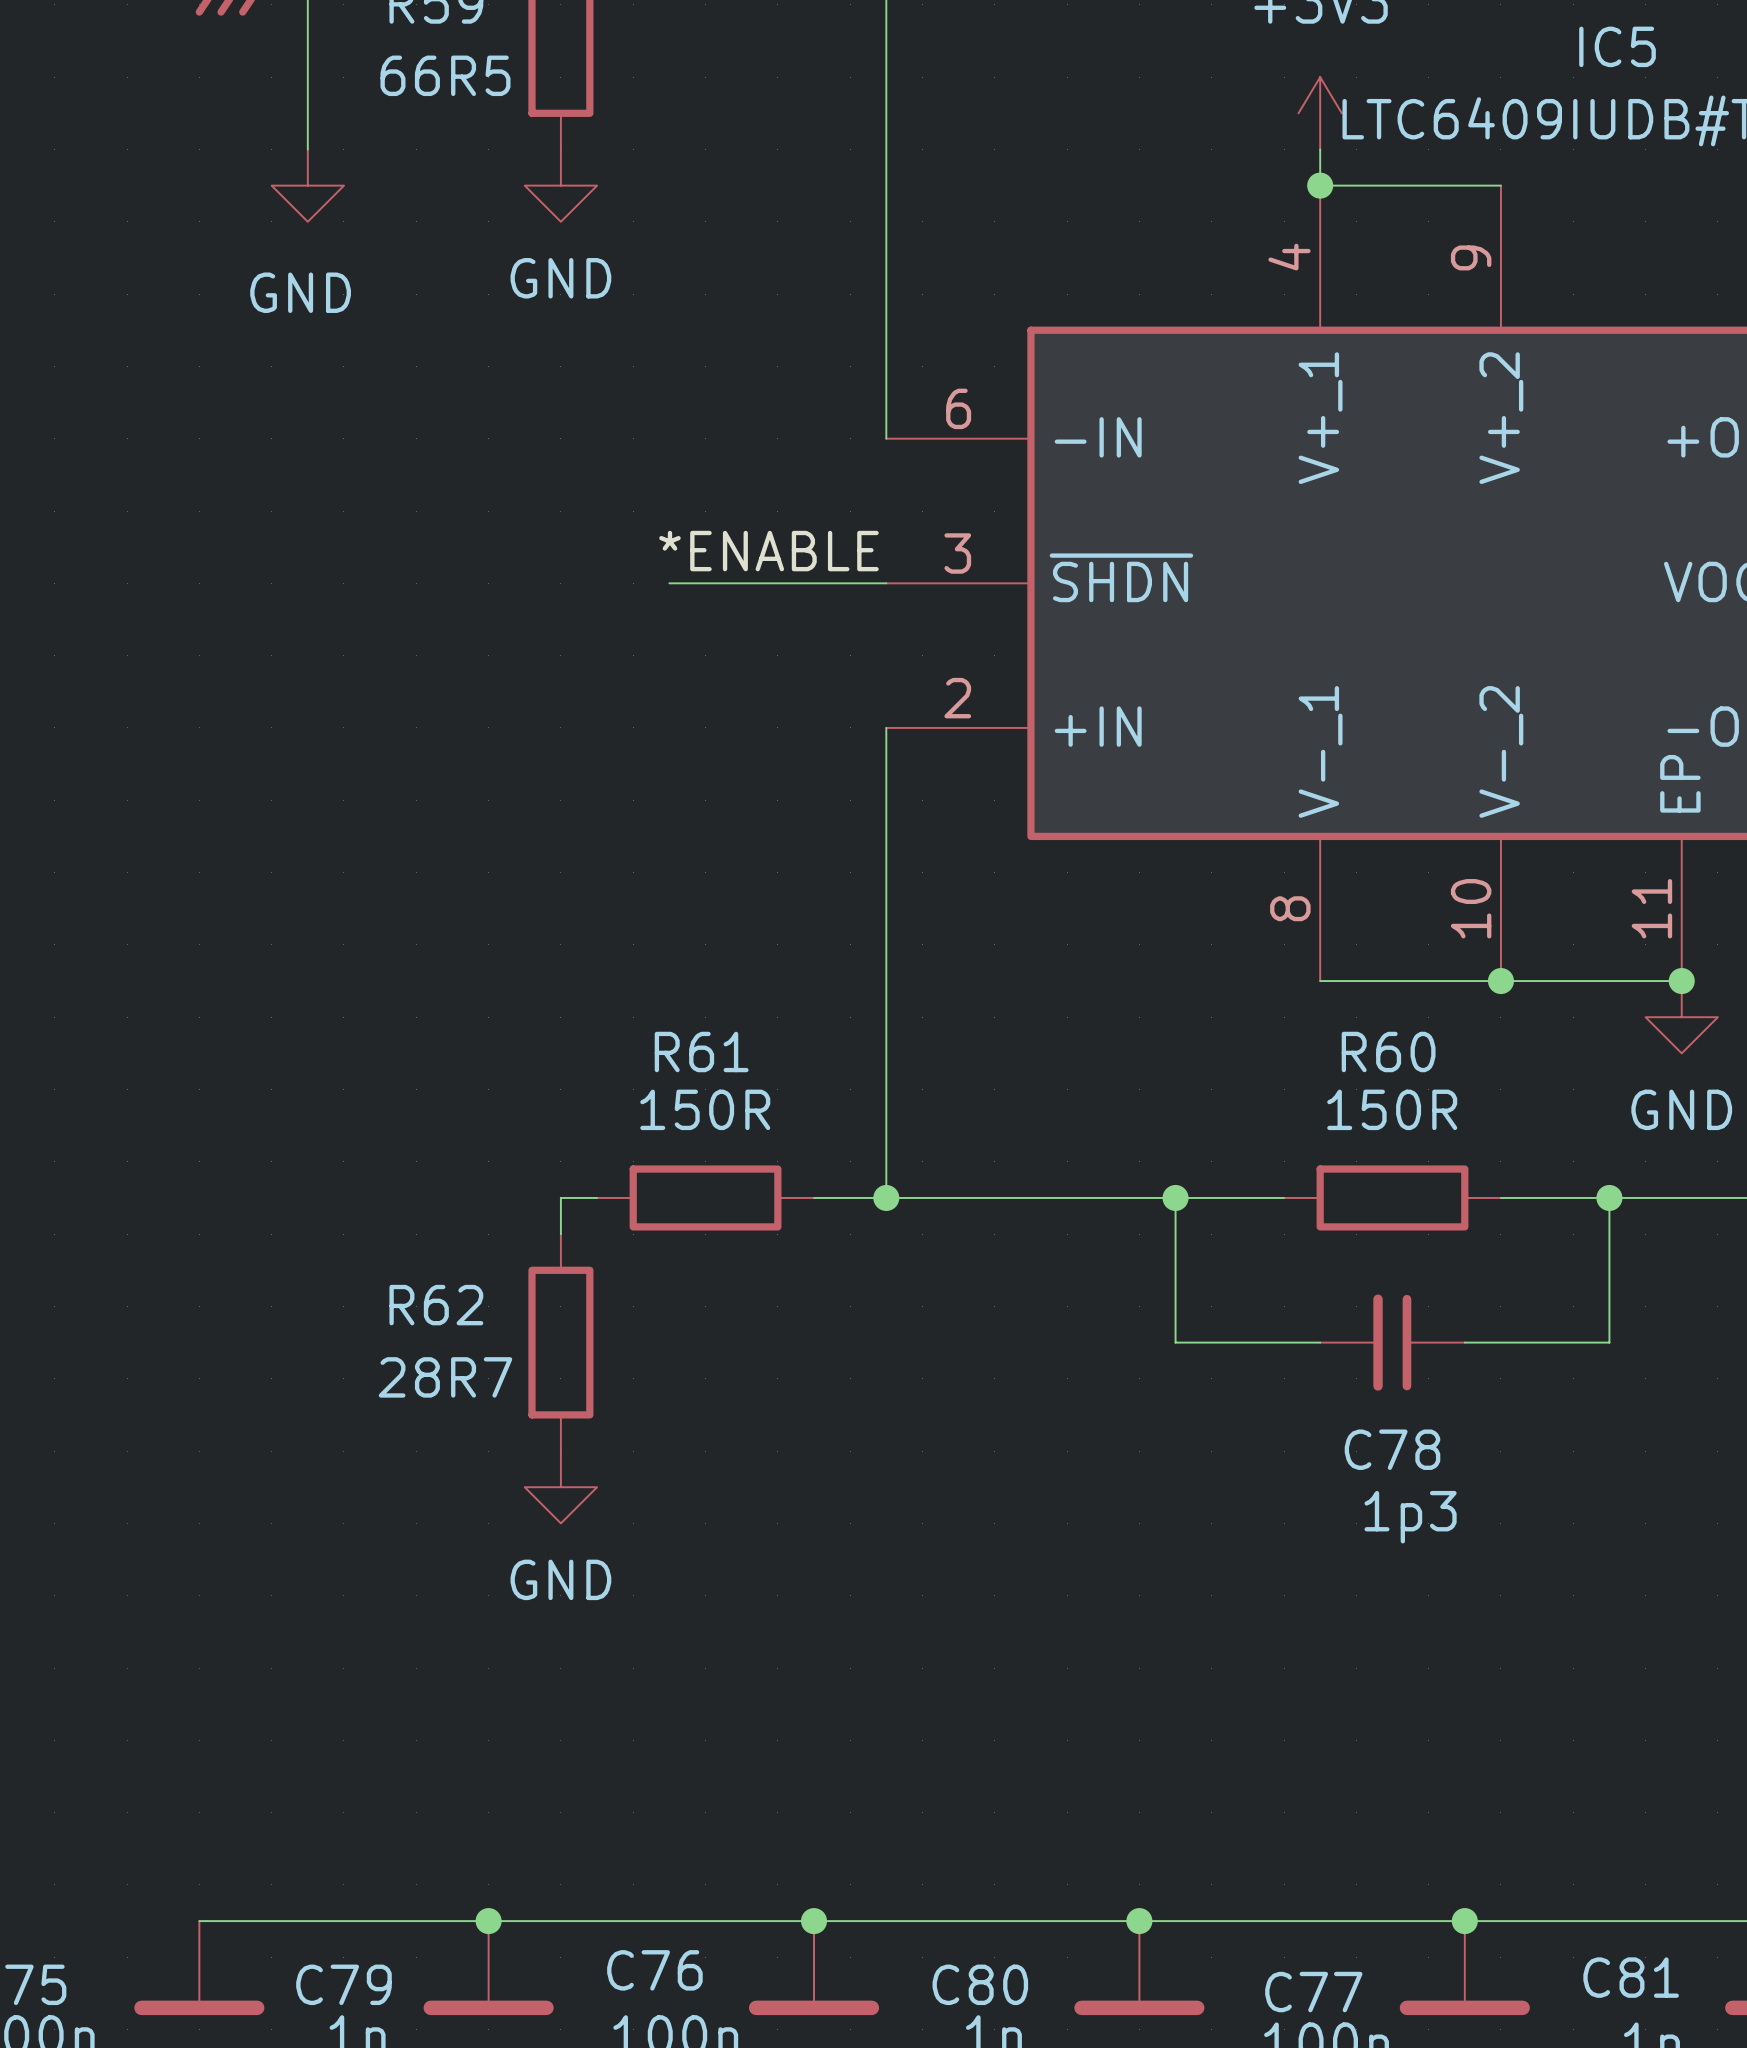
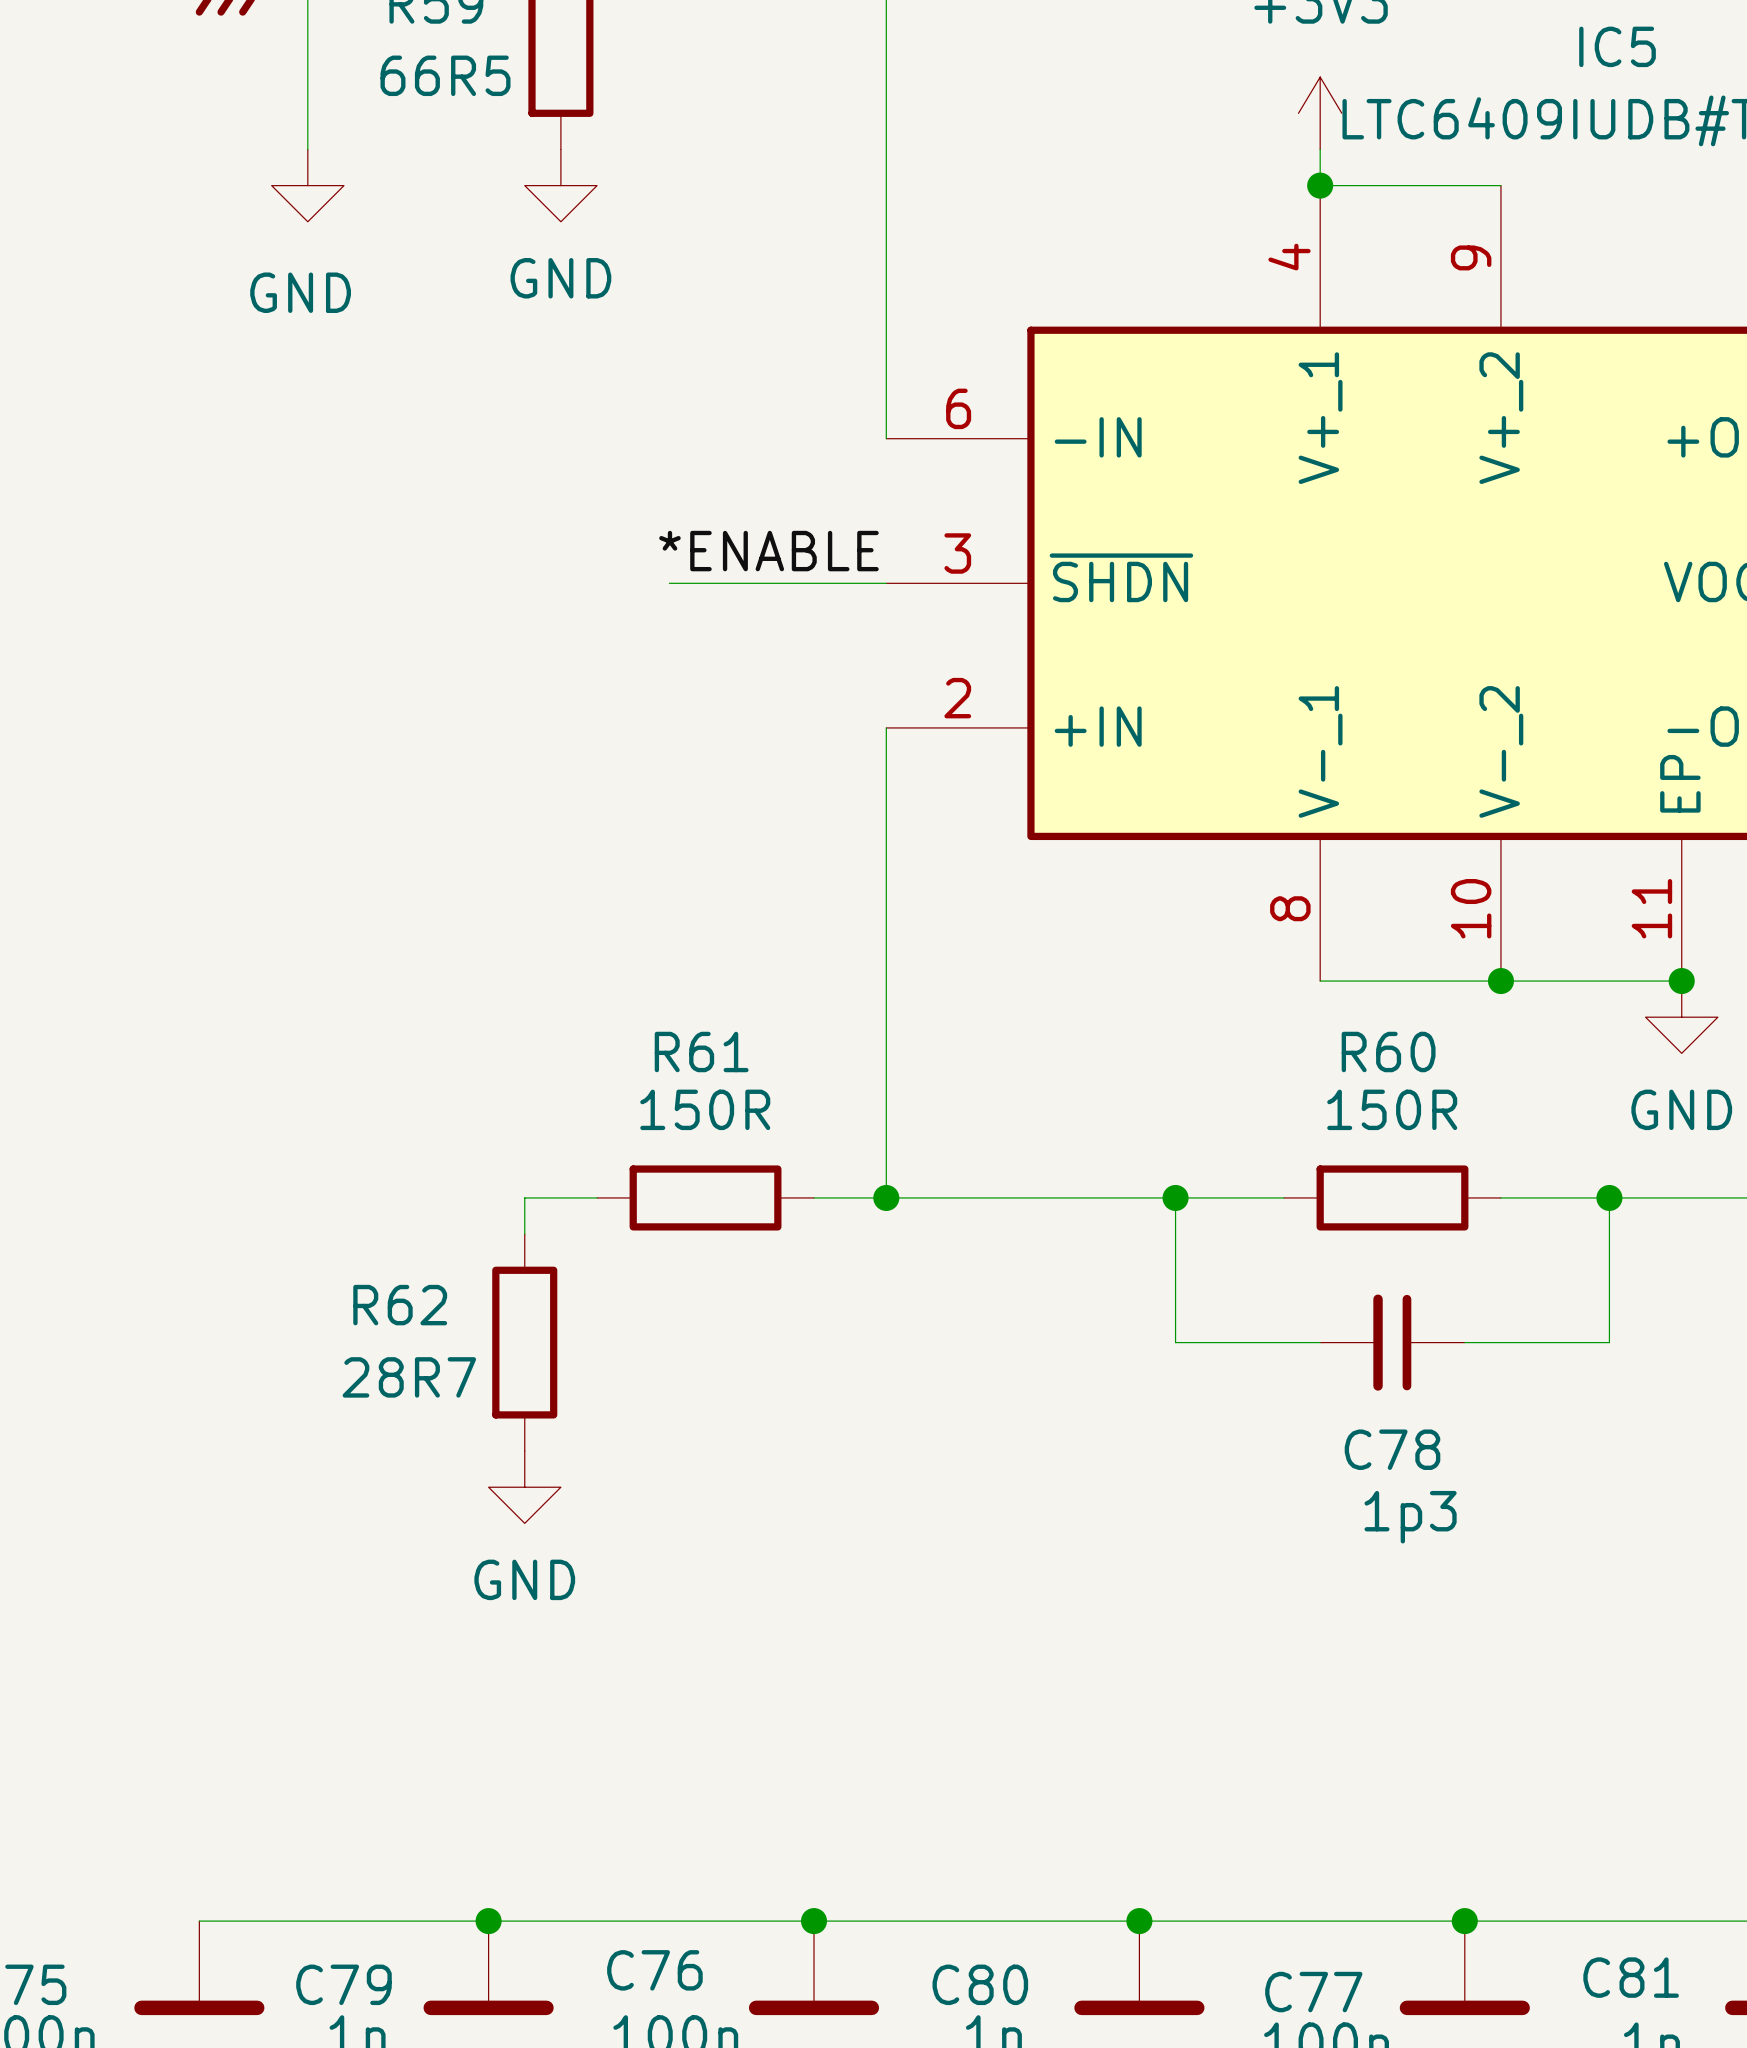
wire: (560, 1197) (560, 1234) -> (560, 1197) (524, 1197) (524, 1234)
R62 position: (560, 1342) -> (524, 1342)
power symbol position: GND (560, 1487) -> GND (524, 1487)

